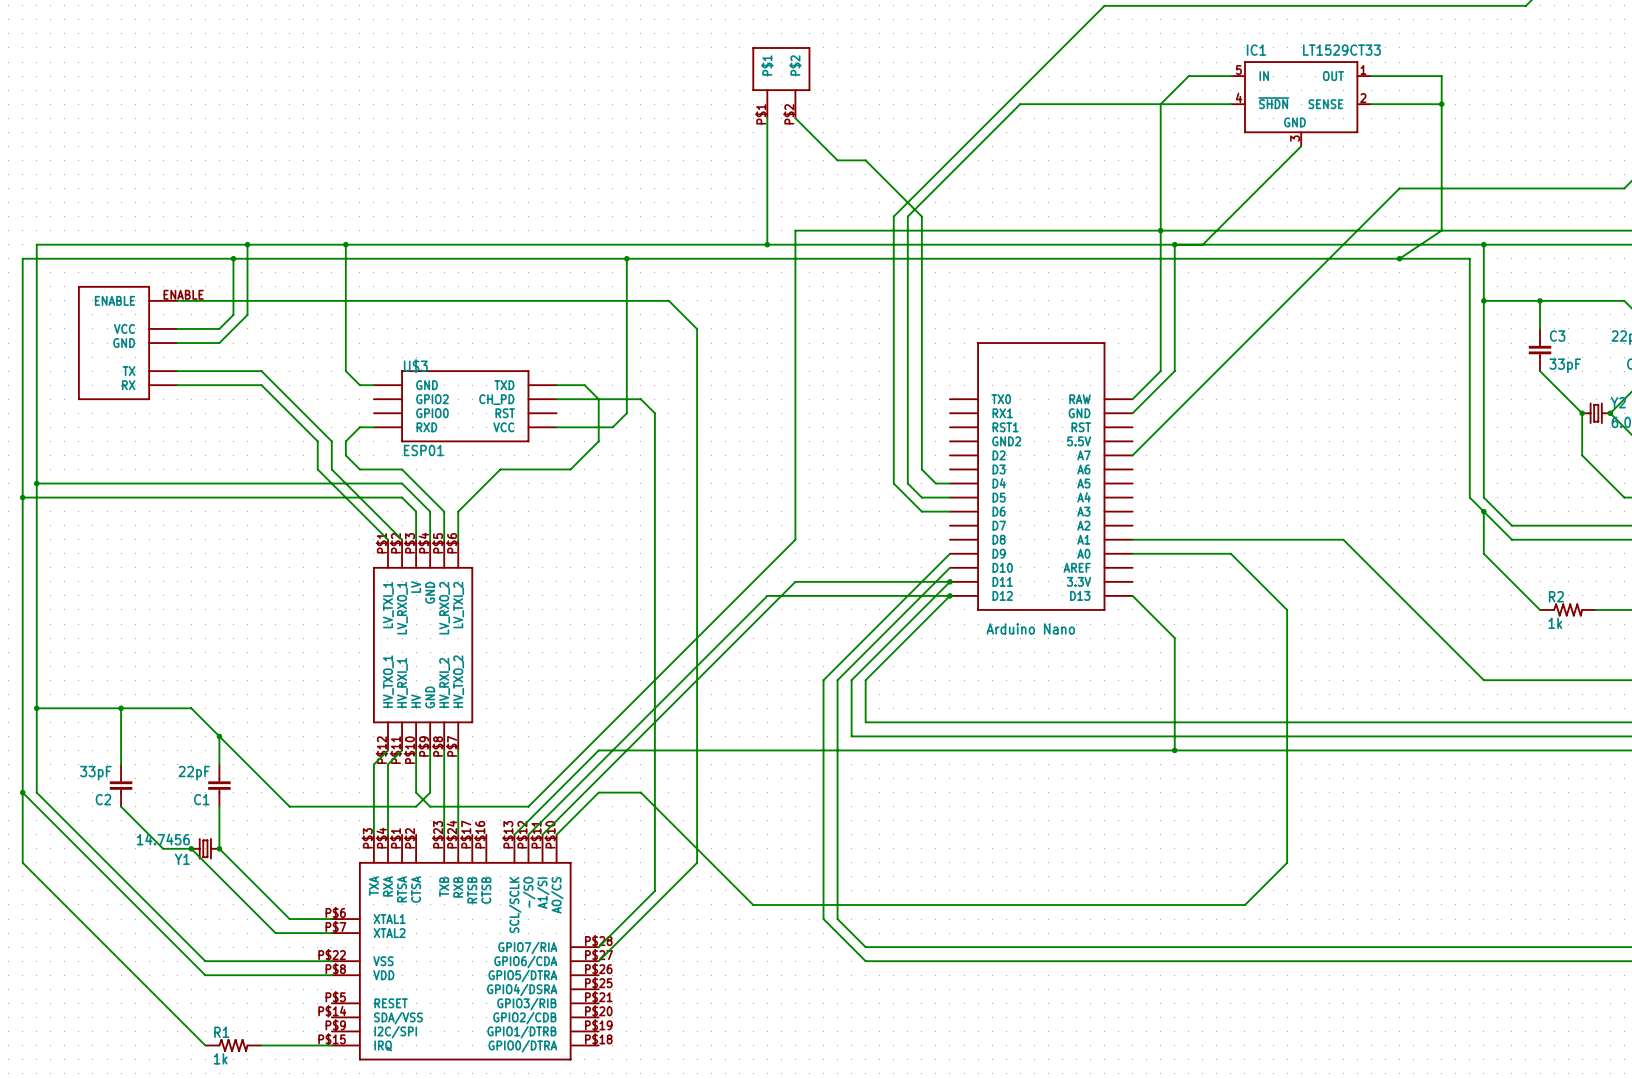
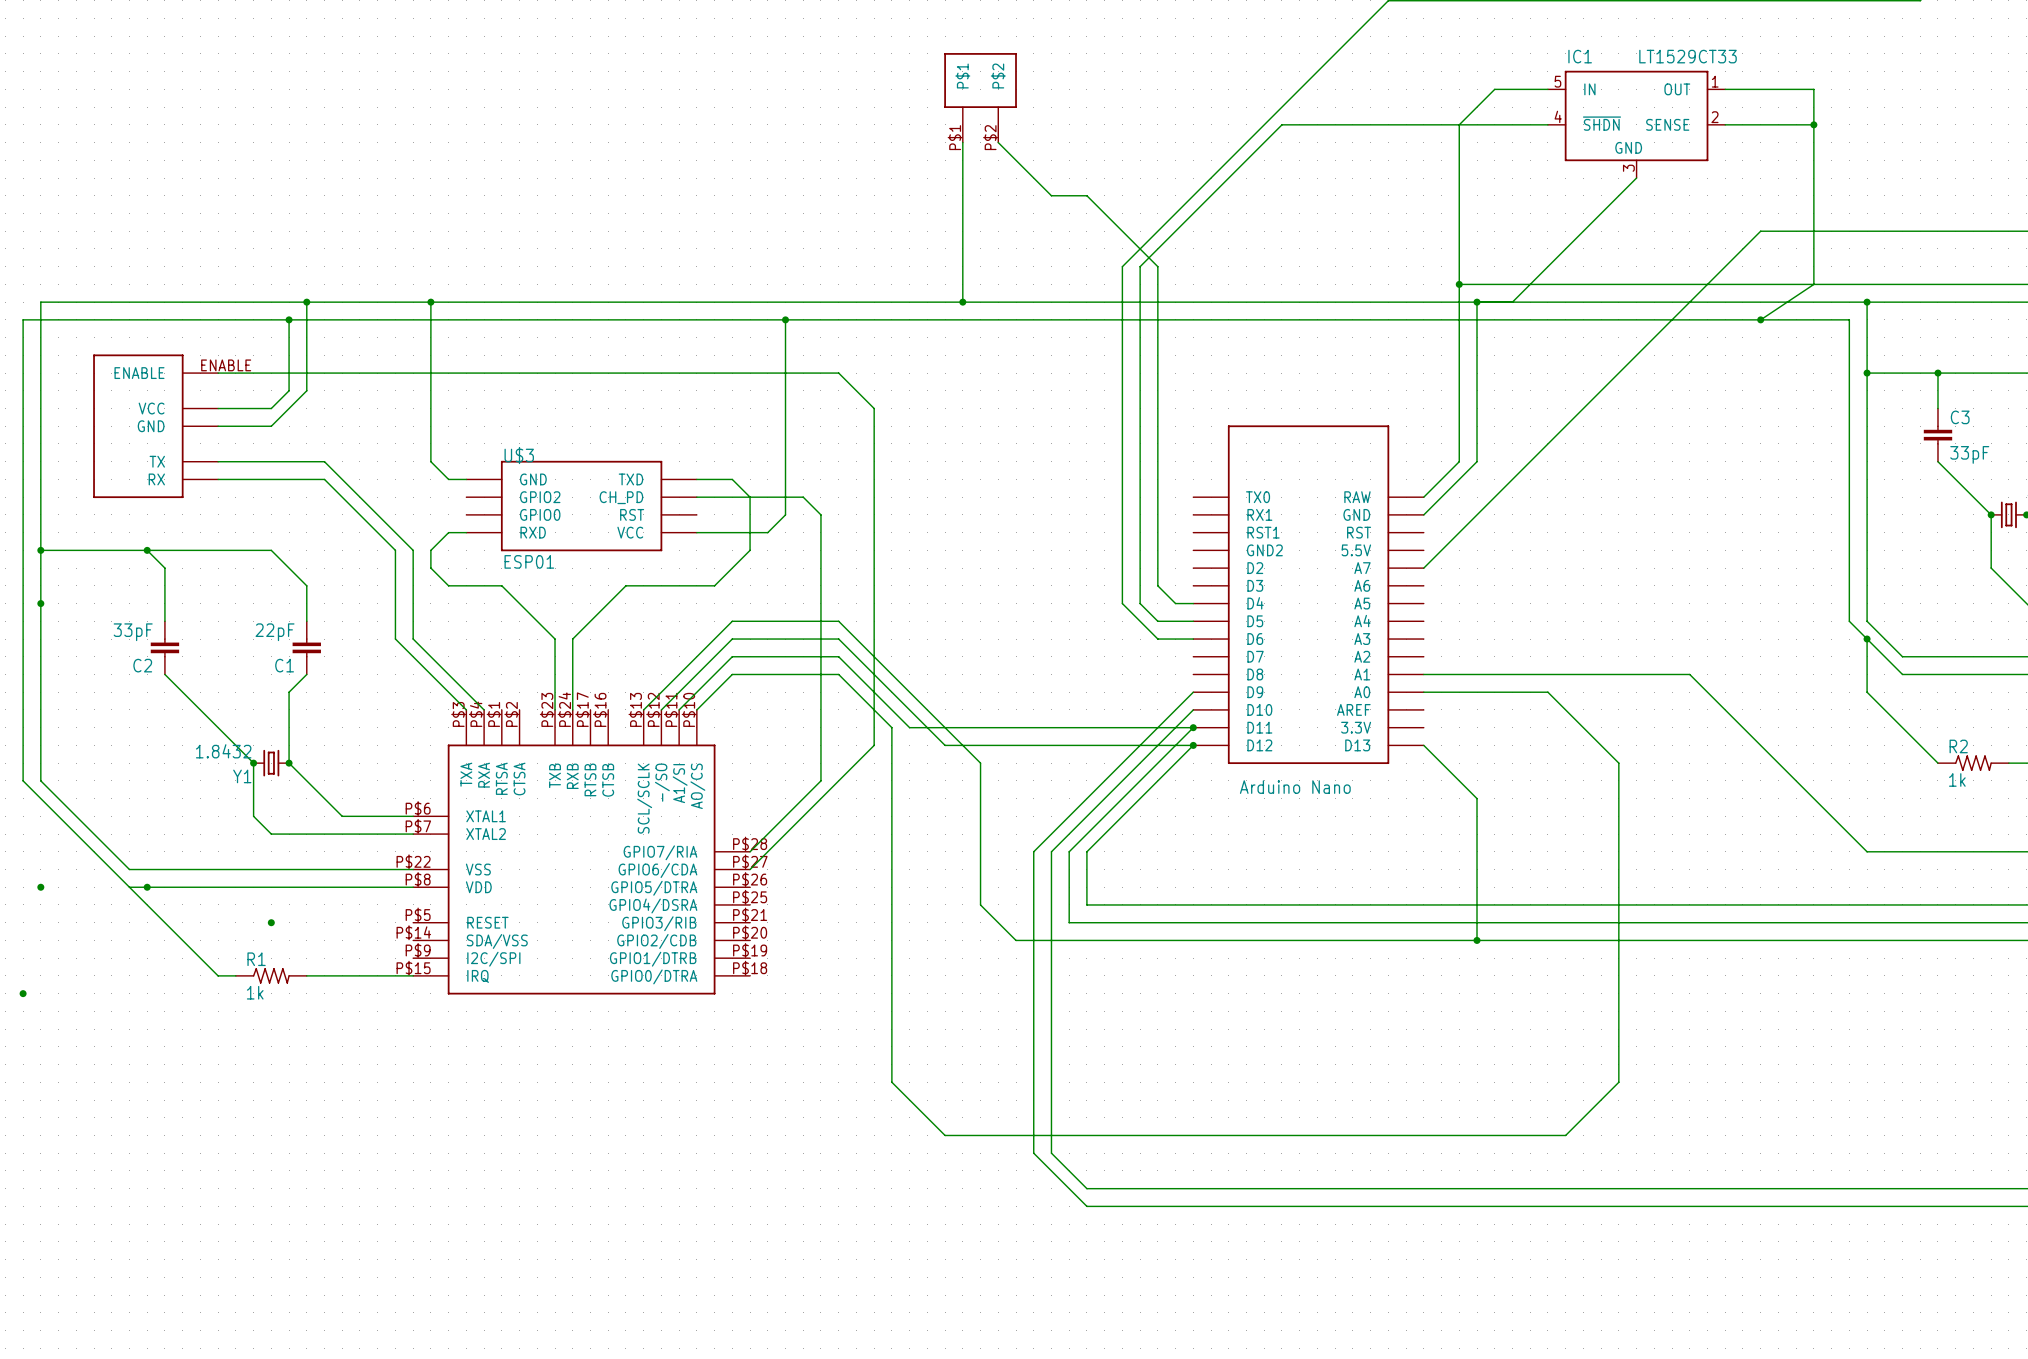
wire: (1160, 230) (795, 230) (795, 539) (528, 806) (430, 806) (416, 792) (416, 750) -> none
wire: none -> (40, 550) (271, 550) (306, 585) (306, 621)
junction: none -> (40, 550)
wire: none -> (147, 550) (164, 568) (164, 621)
junction: none -> (147, 550)
wire: (317, 469) (387, 539) -> (395, 585) (395, 639) (466, 709)
wire: (331, 469) (402, 539) -> (413, 585) (413, 639) (484, 709)
wire: (36, 483) (402, 483) (430, 511) (430, 539) -> none
wire: (22, 497) (402, 497) (416, 511) (416, 539) -> none
junction: (22, 497) -> none
wire: none -> (164, 674) (253, 763) (253, 816) (271, 834) (413, 834)
wire: none -> (306, 674) (289, 692) (289, 763) (342, 816) (413, 816)
wire: (795, 581) (542, 834) -> (998, 727) (909, 727) (838, 656) (732, 656) (679, 709)
wire: (697, 595) (697, 862) (598, 961) -> (874, 745) (750, 869)
wire: (767, 595) (528, 834) -> (962, 745) (945, 745) (838, 639) (732, 639) (661, 709)
junction: none -> (253, 763)
junction: none -> (289, 763)
wire: (22, 624) (22, 862) (205, 1045) -> (23, 780) (218, 975) (235, 975)
wire: (36, 624) (36, 792) (205, 961) (331, 961) -> (40, 780) (129, 869) (413, 869)
wire: (654, 624) (654, 890) (598, 947) -> (820, 780) (750, 851)
part: (423, 645) -> none
part: none -> (581, 852)
wire: (36, 708) (107, 708) -> none
wire: (121, 708) (121, 764) -> none
wire: (191, 708) (289, 806) (416, 806) (430, 792) (430, 750) -> (235, 887) (413, 887)
wire: (219, 736) (219, 764) -> none
wire: (387, 750) (373, 764) (373, 834) -> none
wire: (402, 750) (387, 764) (387, 834) -> none
wire: (444, 750) (444, 834) -> none
wire: (458, 750) (458, 834) -> none
wire: (809, 750) (598, 750) (514, 834) -> (1016, 940) (980, 904) (980, 763) (838, 621) (732, 621) (643, 709)
wire: none -> (306, 975) (413, 975)
C2 position: (121, 785) -> (164, 647)
C1 position: (219, 785) -> (306, 647)
wire: (22, 792) (205, 975) (331, 975) -> none
wire: (121, 806) (163, 848) (191, 848) (275, 933) (331, 933) -> none
wire: (219, 806) (219, 848) (289, 919) (331, 919) -> none
wire: (556, 834) (598, 792) (640, 792) (711, 862) -> (696, 709) (732, 674) (838, 674) (891, 727) (891, 1082)
Y1 value: 14.7456 (163, 839) -> 1.8432 (223, 751)
junction: (191, 848) -> none
Y1 position: (205, 848) -> (271, 763)
junction: (219, 848) -> none
part: (465, 947) -> none
R1 position: (233, 1045) -> (271, 975)
wire: (261, 1045) (331, 1045) -> none

